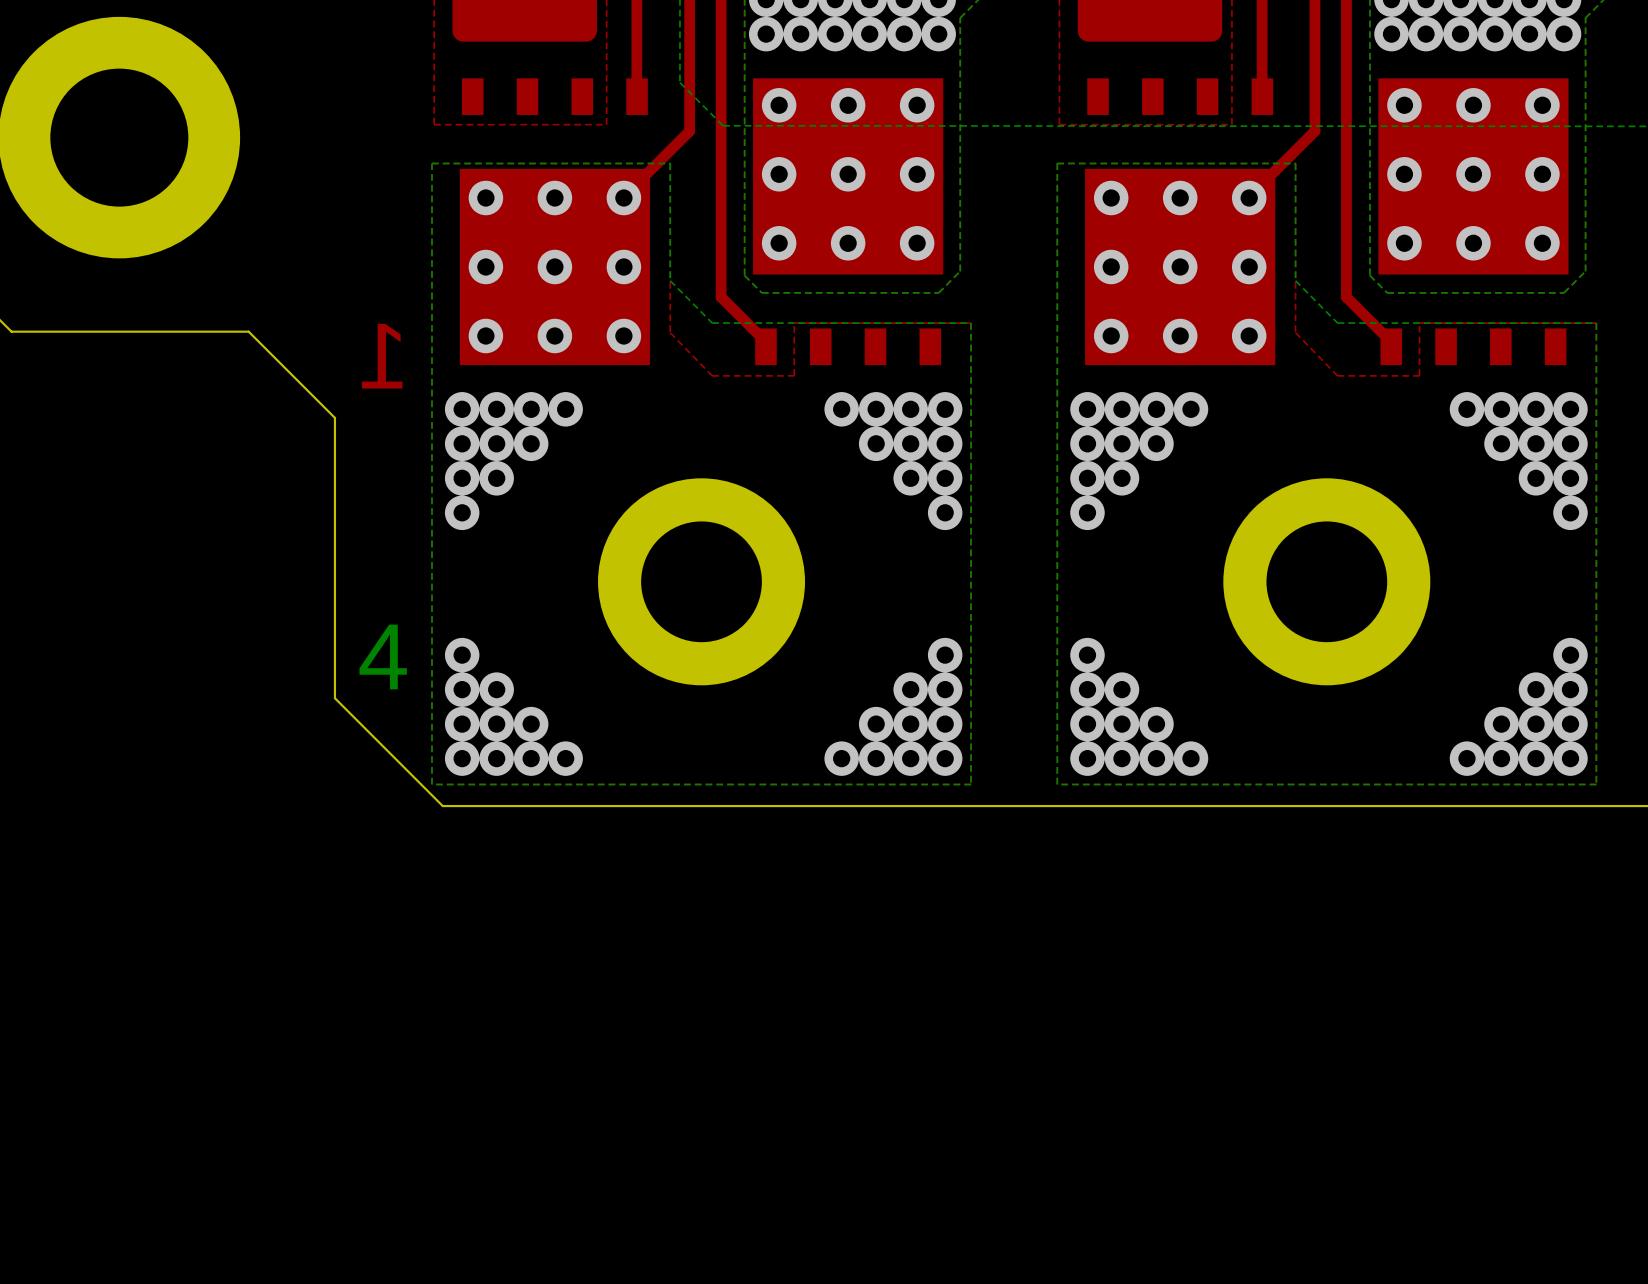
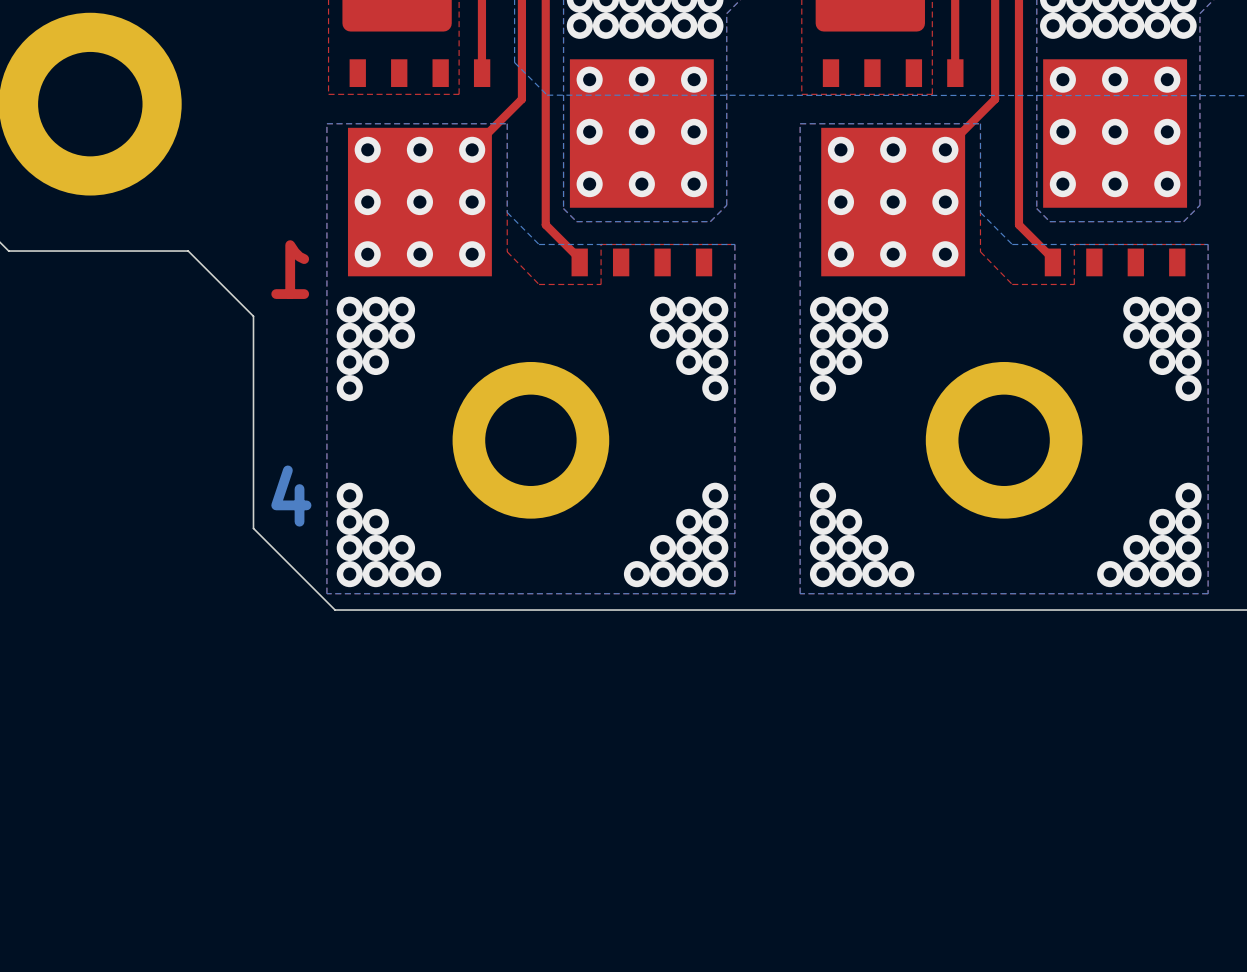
via: (565, 409) -> none
via: (841, 409) -> none
via: (1190, 409) -> none
via: (1466, 409) -> none

